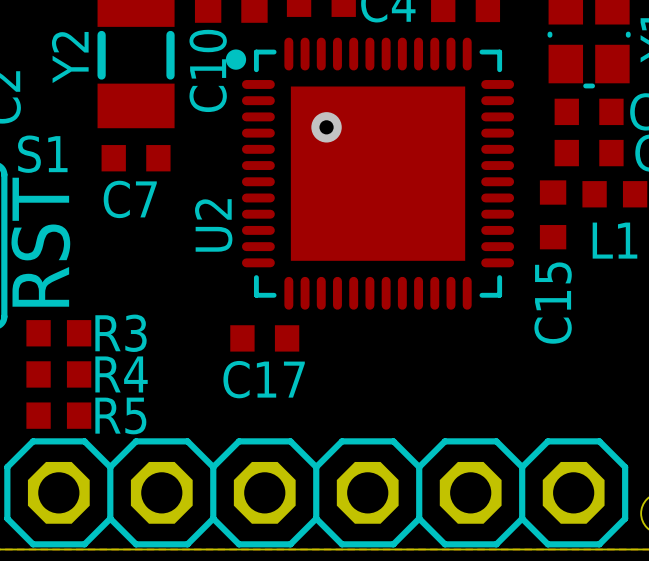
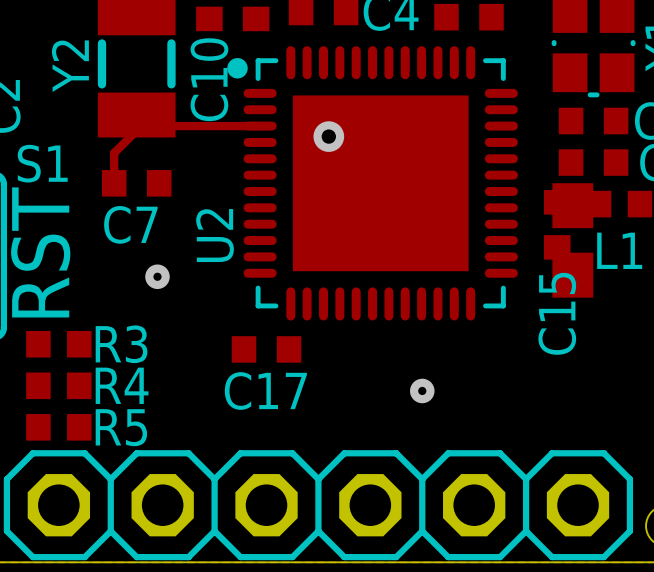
top track: none -> (260, 126) (141, 126) (114, 153) (114, 183)
C7 position: (136, 158) -> (136, 183)
part: none -> (572, 240)
via: none -> (157, 276)
via: none -> (422, 390)

